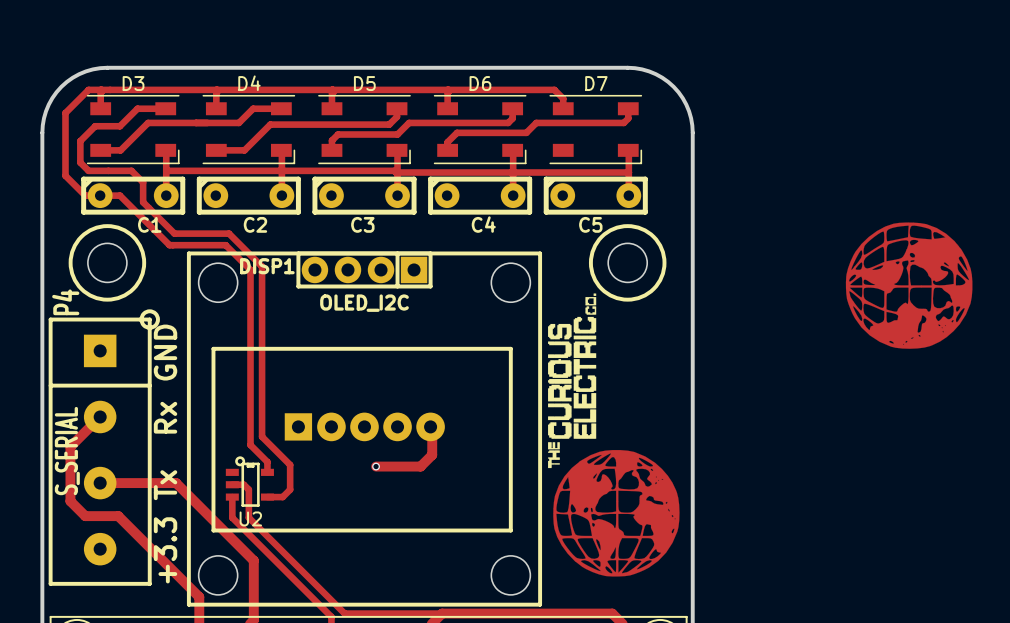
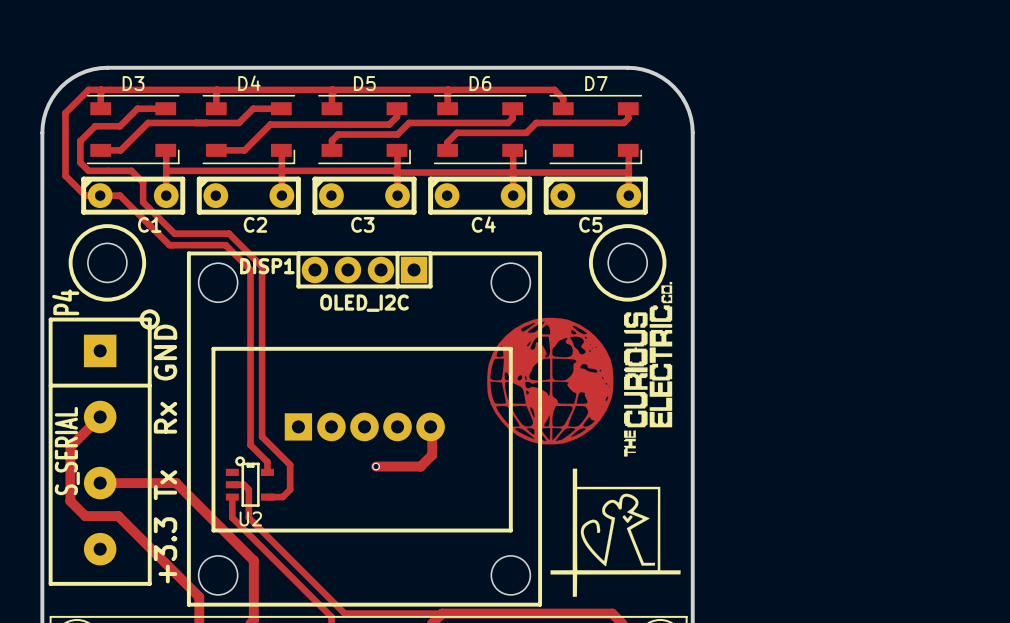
part: (909, 285) -> none
drawing position: (572, 380) -> (648, 369)
drawing: none -> [550, 468, 681, 597]
part position: (616, 513) -> (550, 381)

